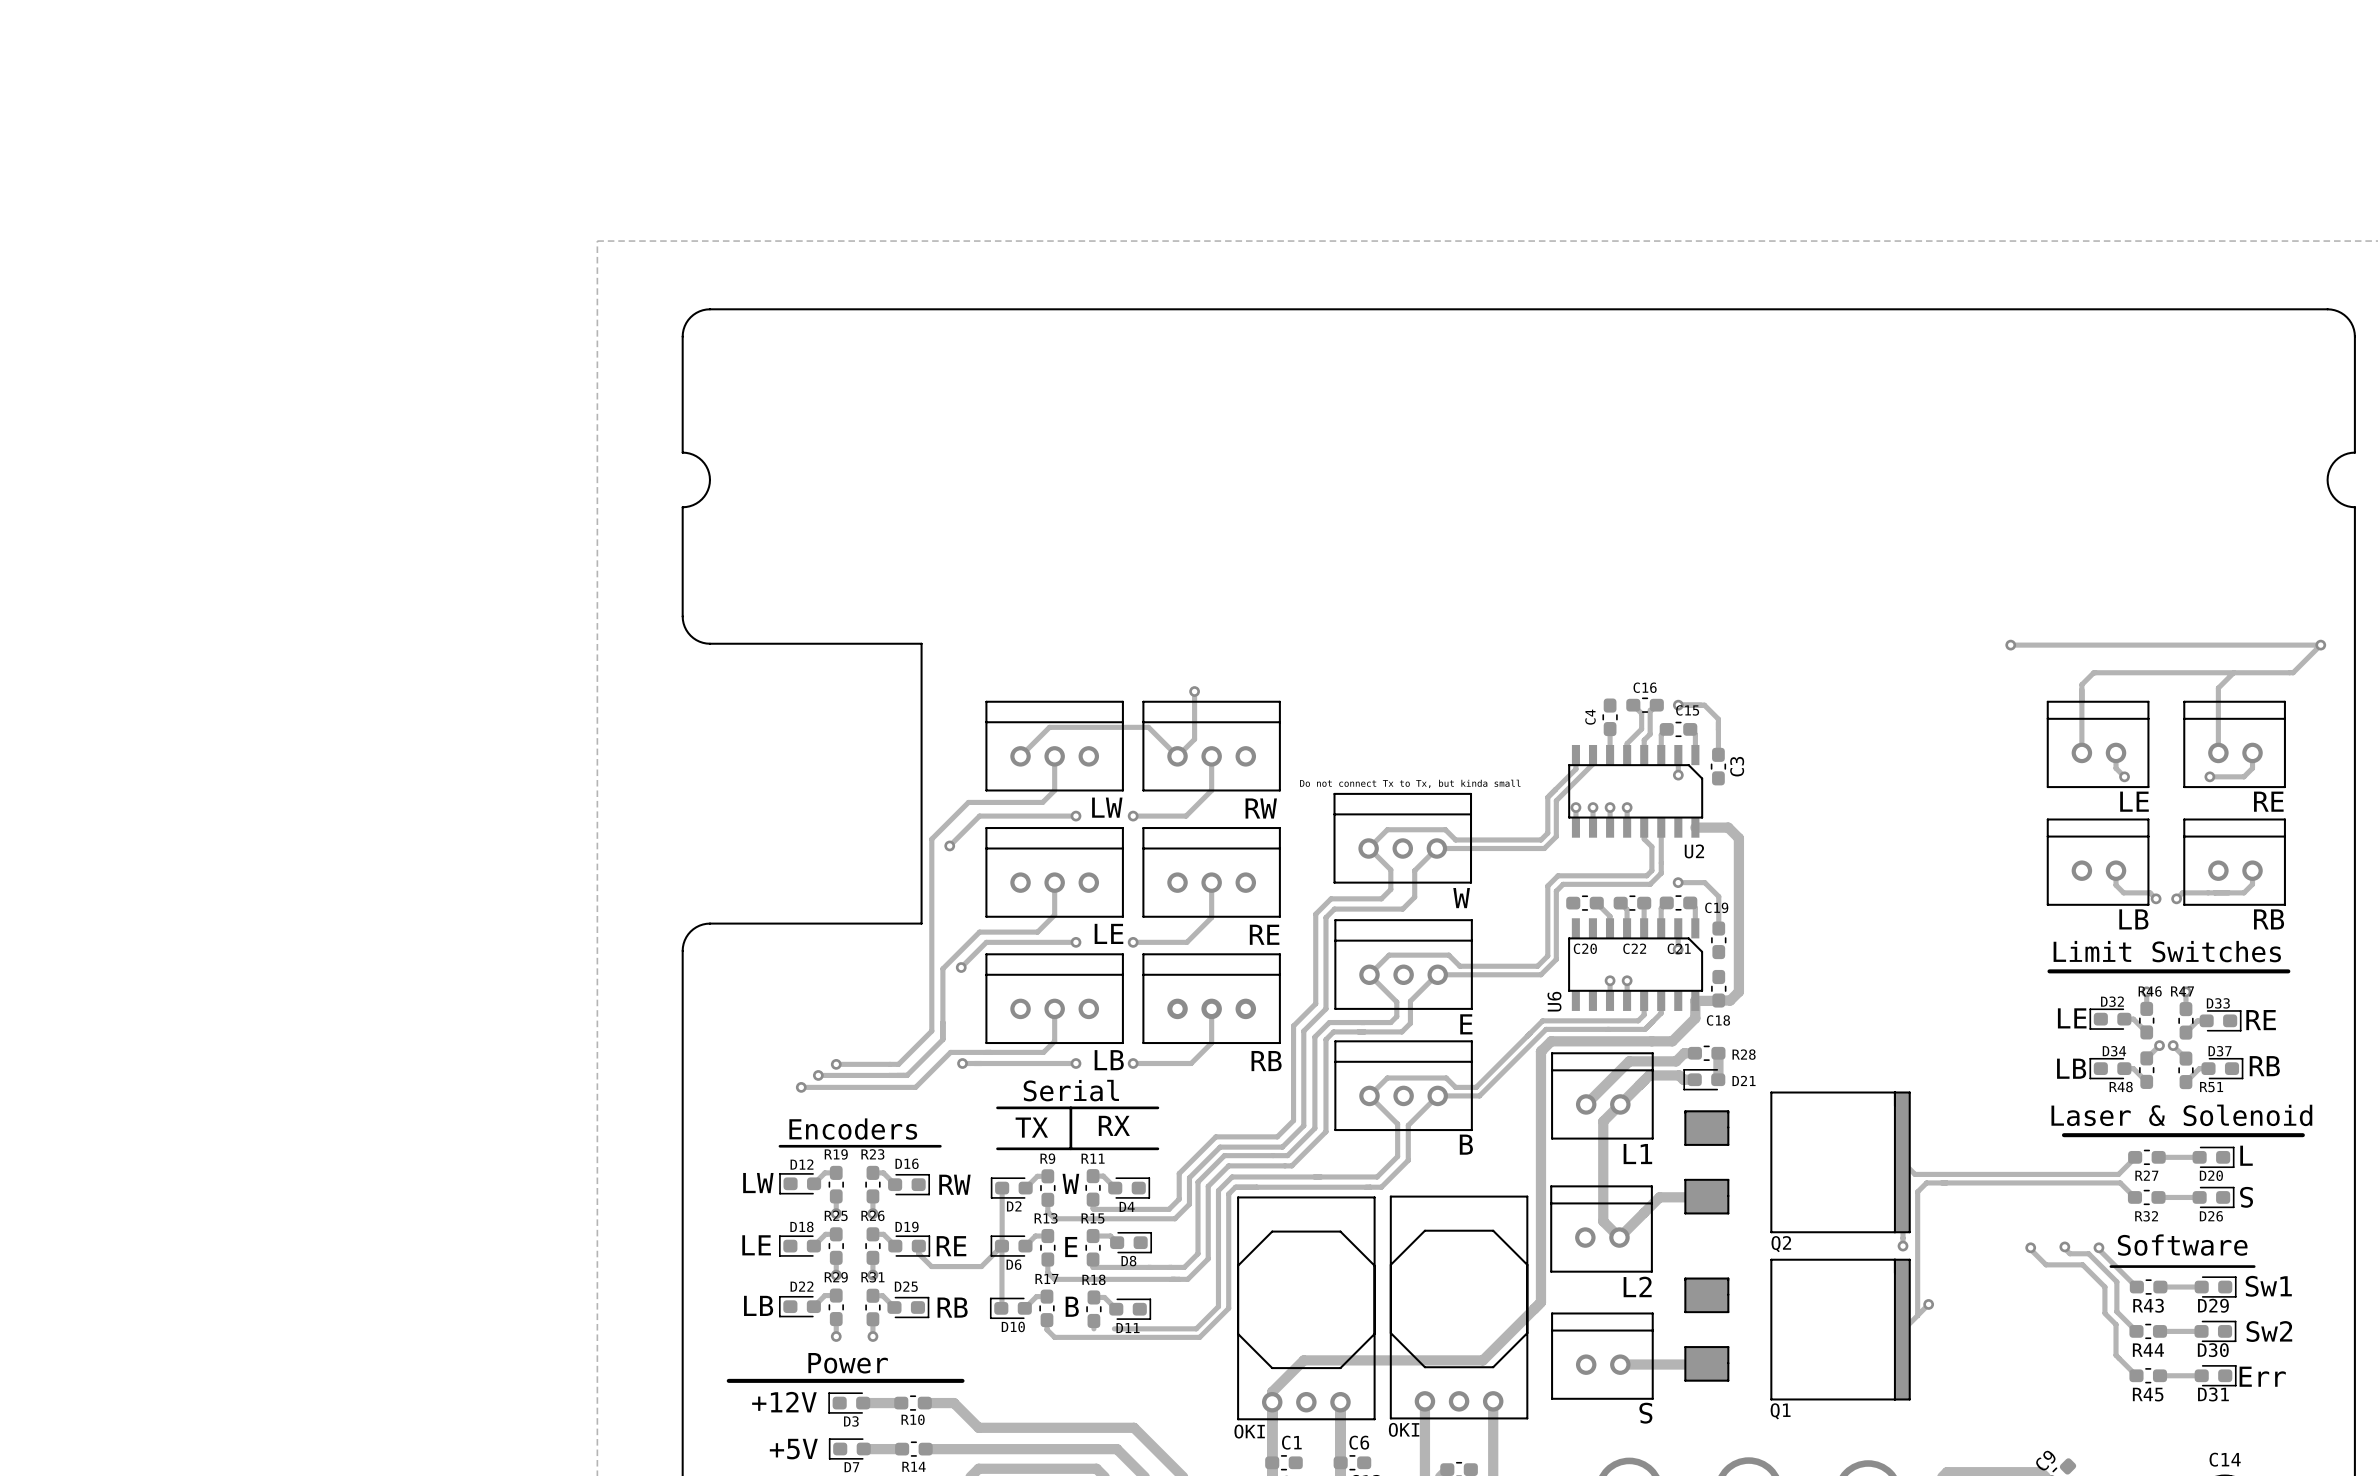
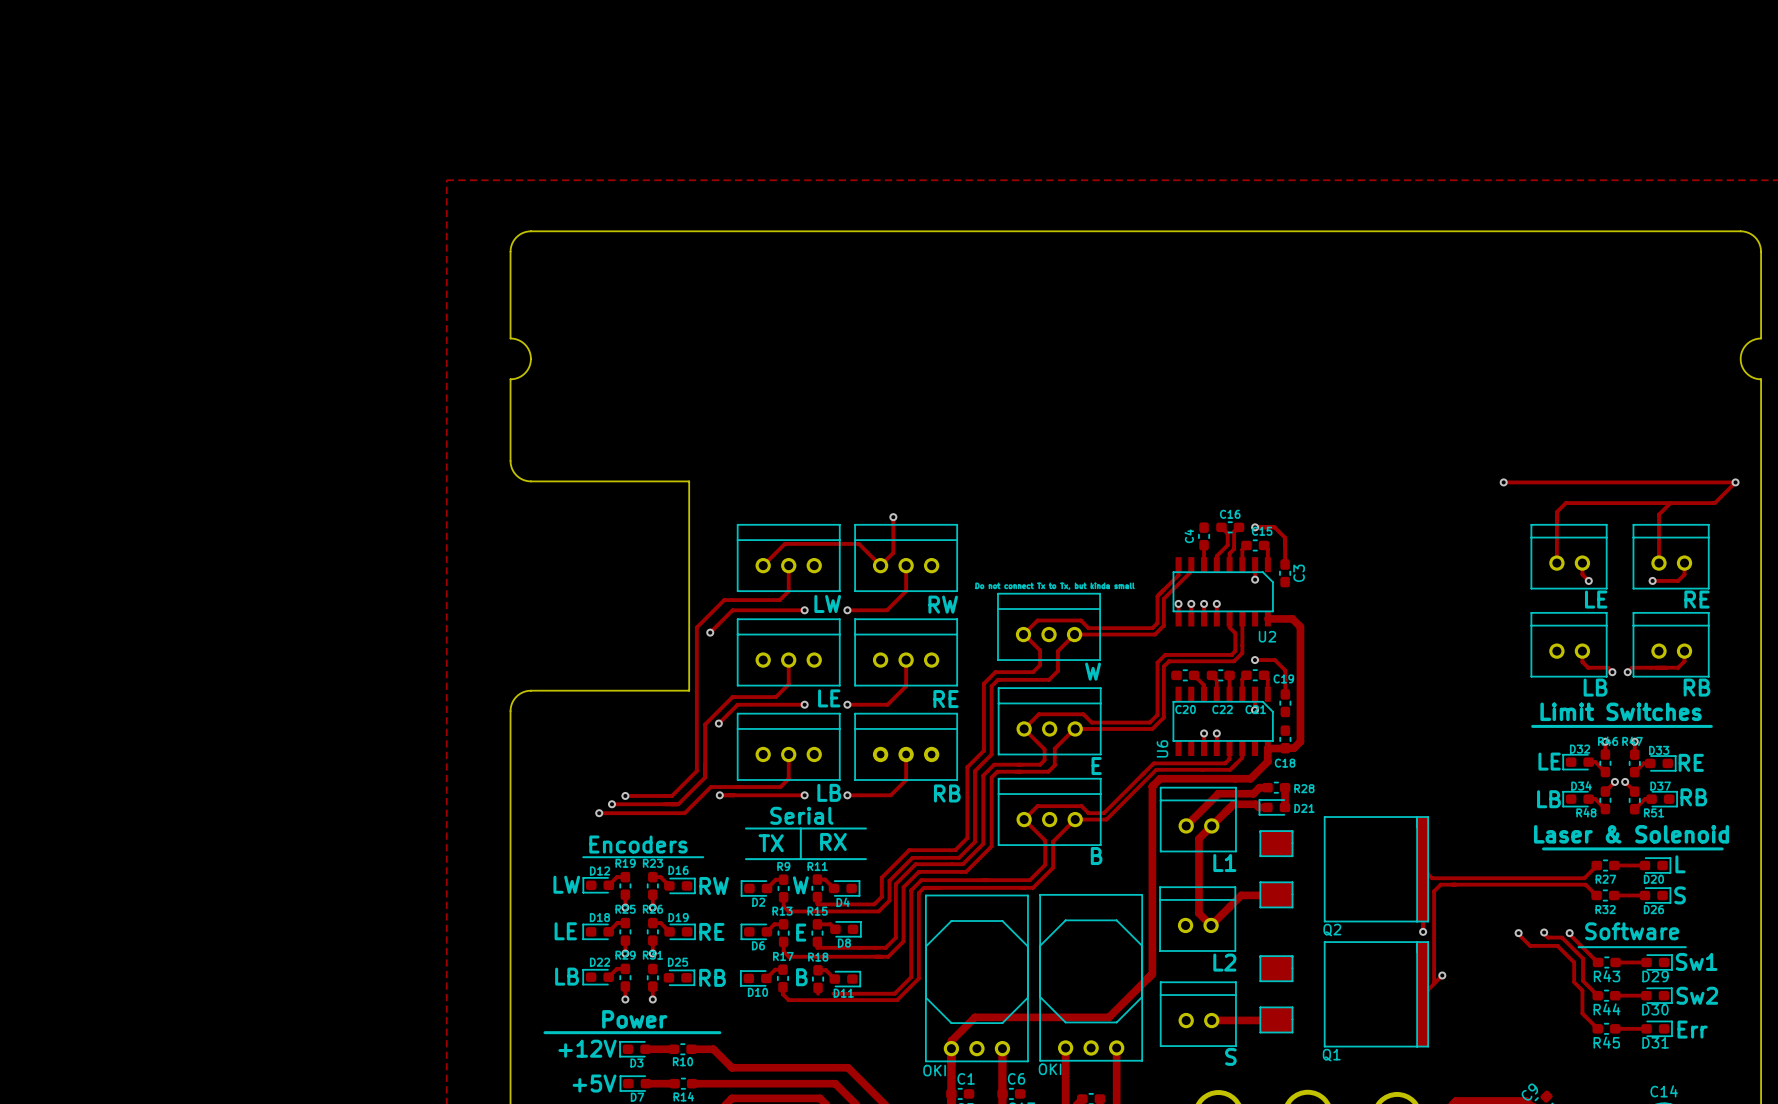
track: (1002, 1188) (1002, 1245) (981, 1266) (931, 1266) (918, 1253) (918, 1246) -> none
track: (1001, 1246) (1001, 1308) -> none
track: (872, 1295) (882, 1295) (894, 1307) -> none

